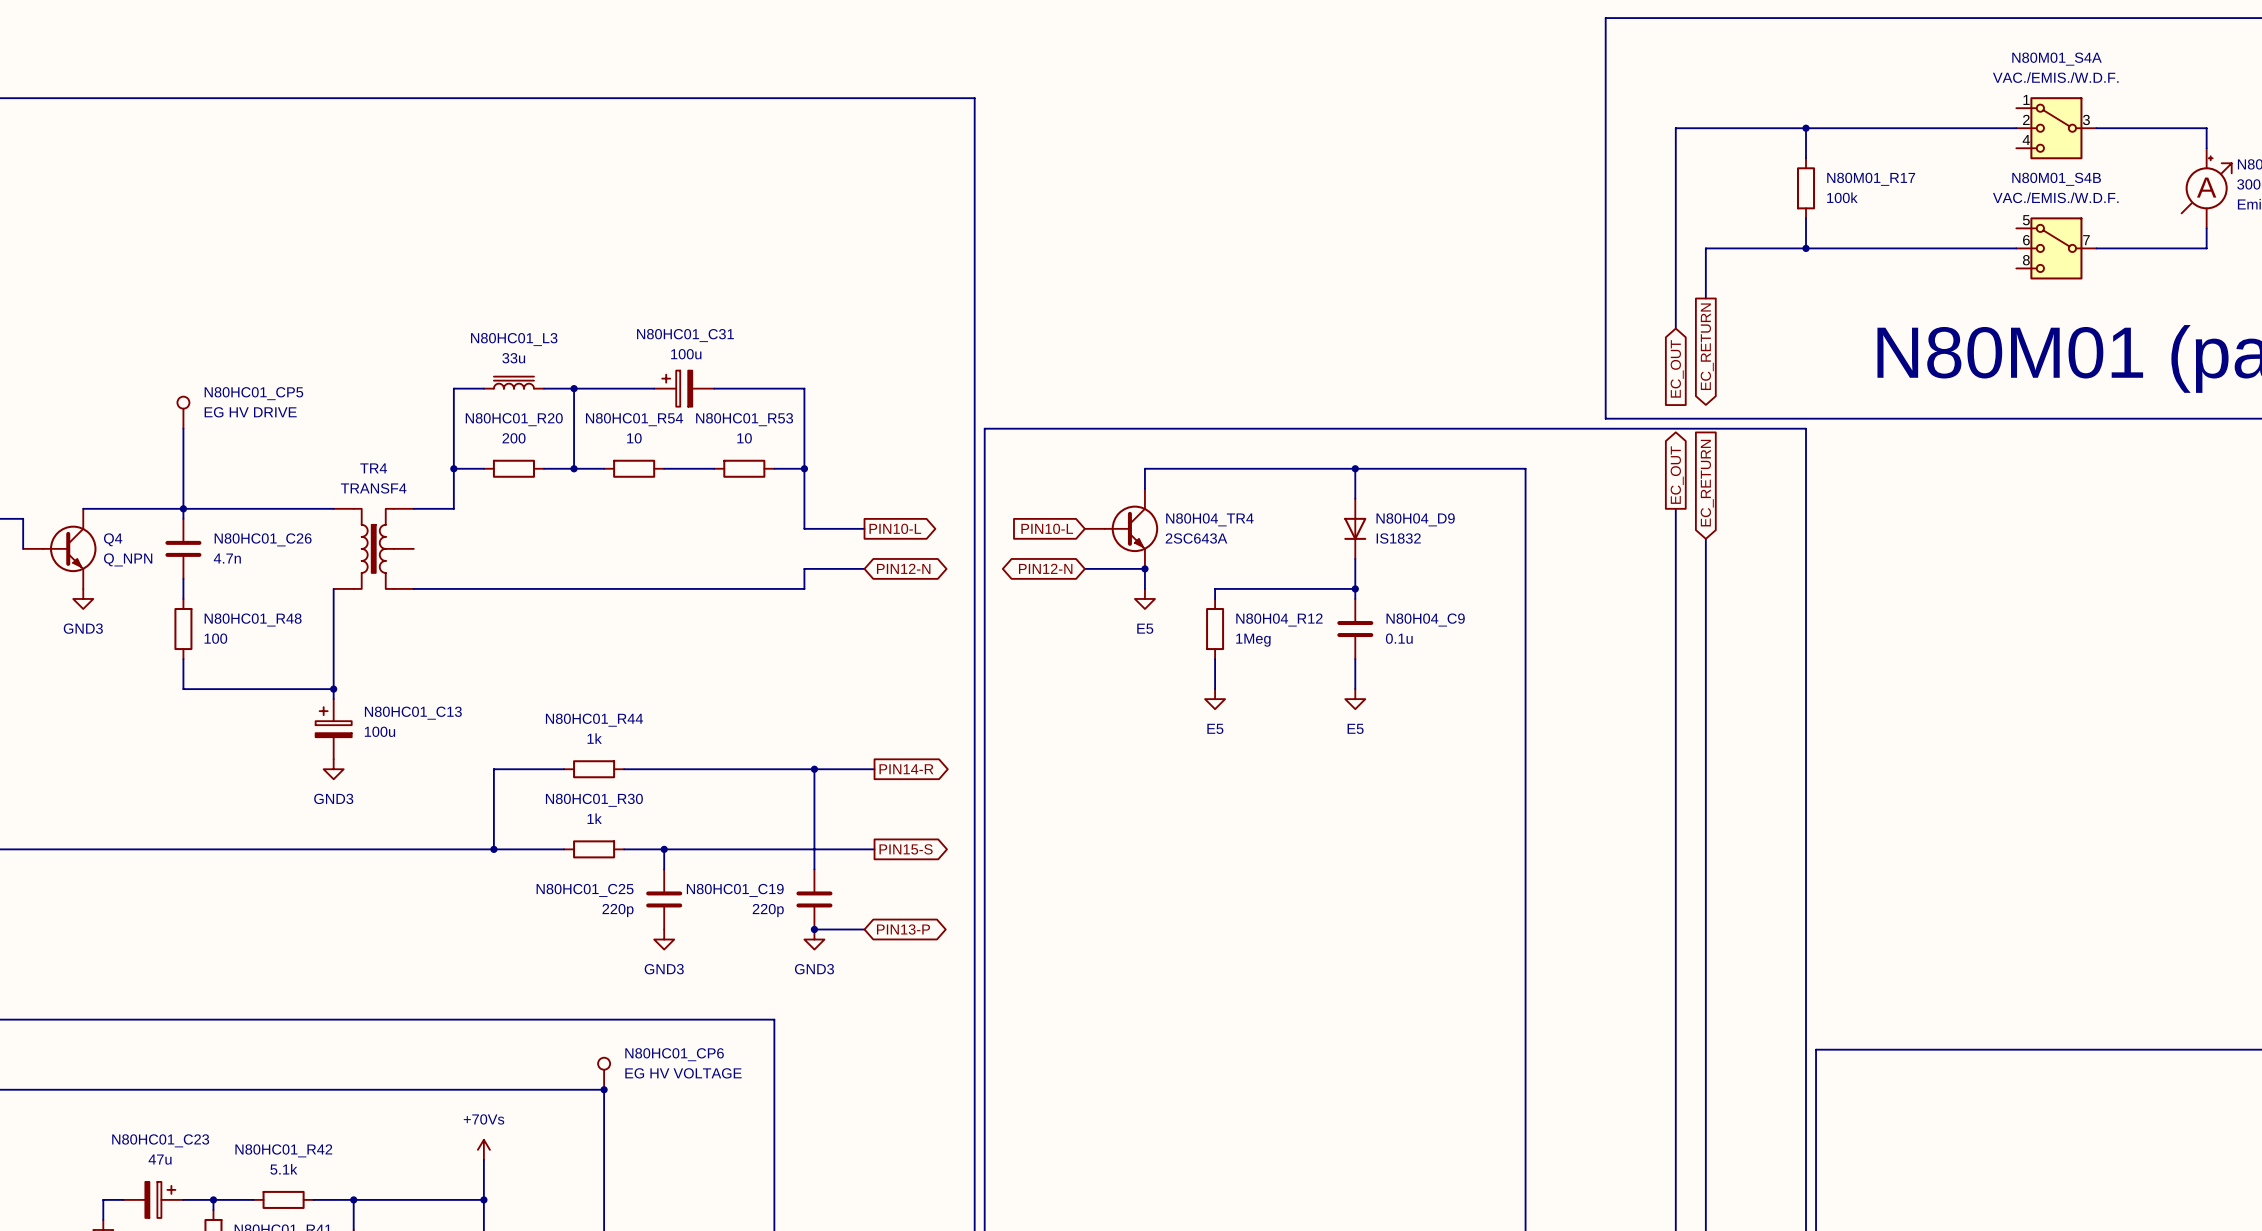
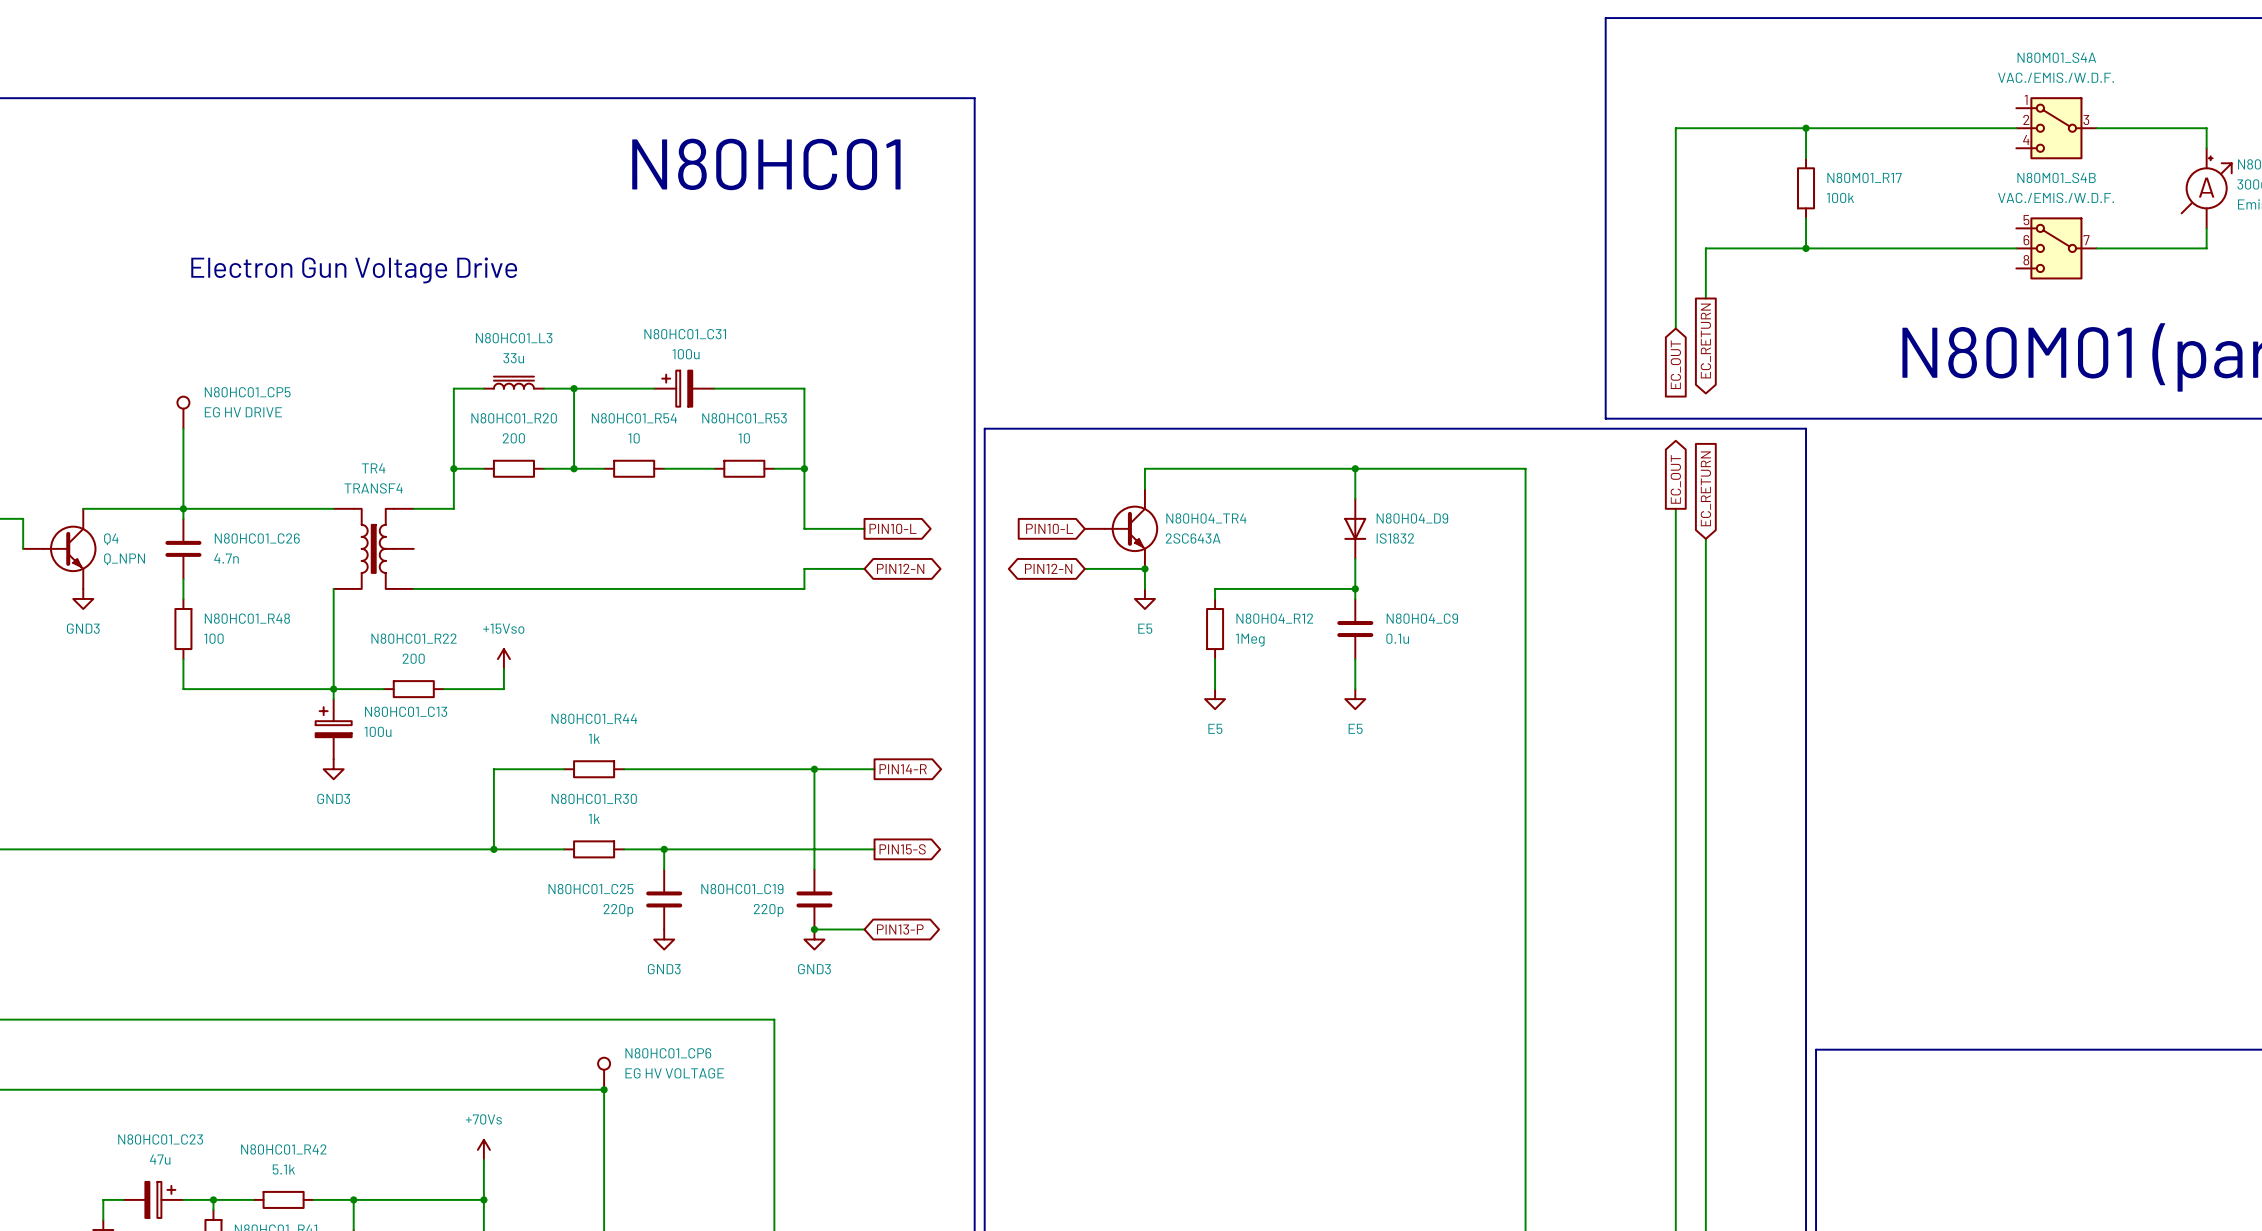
text: none -> N80HC01 (766, 164)
text: none -> Electron Gun Voltage Drive (354, 270)
power symbol: none -> +15Vso (503, 659)
wire: none -> (503, 669) (503, 689) (443, 689)
wire: none -> (333, 689) (383, 689)
N80HC01_R22: none -> 200 (413, 689)

